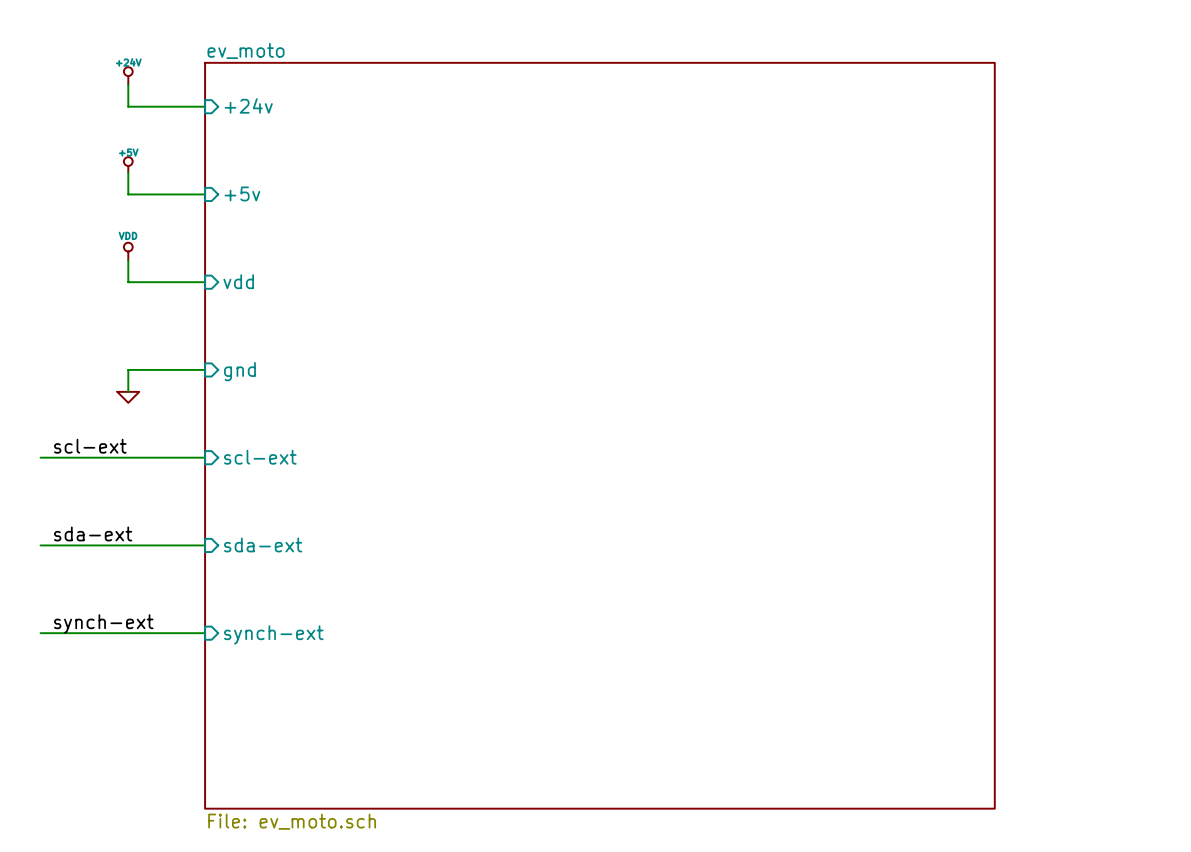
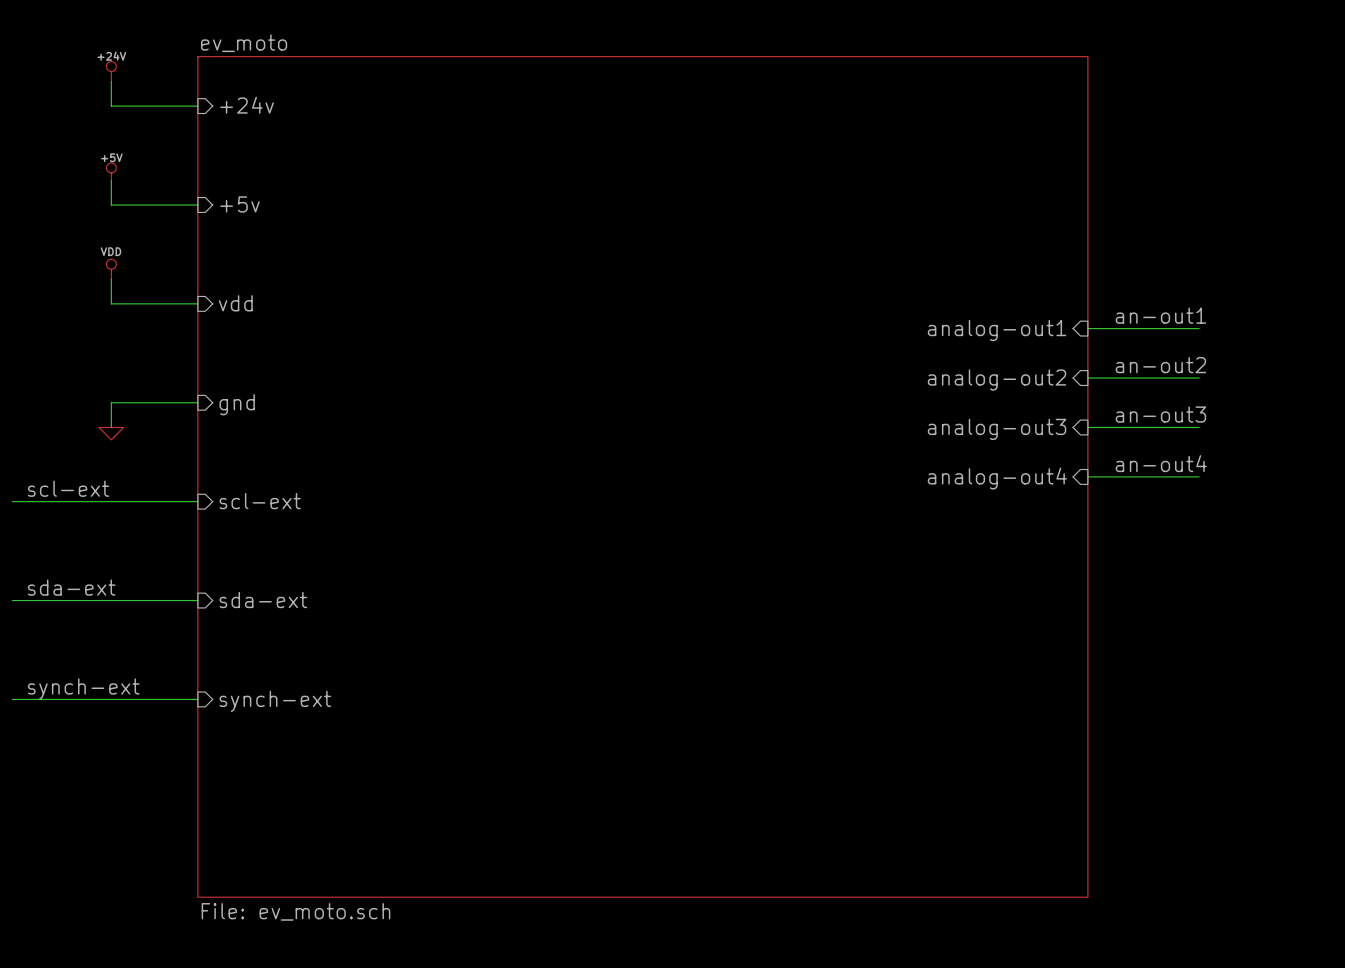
label: none -> an-out1 (1160, 315)
wire: none -> (1087, 328) (1199, 328)
sheet pin: none -> analog-out1 (997, 330)
label: none -> an-out2 (1160, 365)
wire: none -> (1087, 378) (1199, 378)
sheet pin: none -> analog-out2 (997, 379)
label: none -> an-out3 (1160, 414)
wire: none -> (1087, 427) (1199, 427)
sheet pin: none -> analog-out3 (997, 429)
label: none -> an-out4 (1161, 463)
wire: none -> (1087, 476) (1199, 476)
sheet pin: none -> analog-out4 (997, 478)

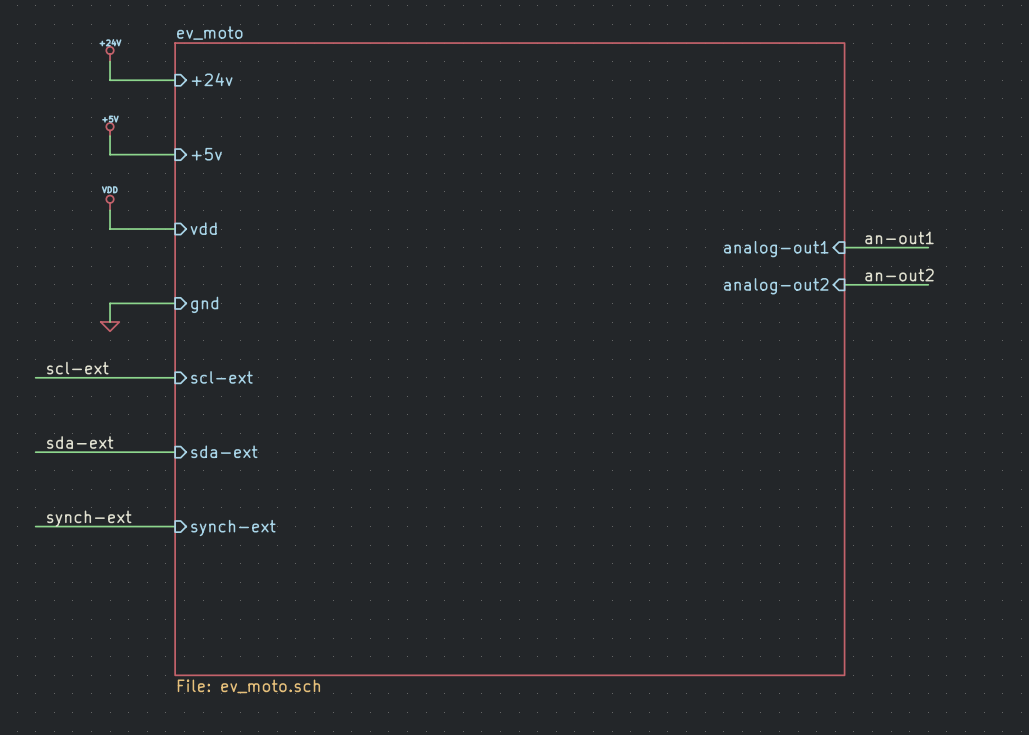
label: an-out3 (1160, 414) -> none
wire: (1087, 427) (1199, 427) -> none
sheet pin: analog-out3 (997, 429) -> none
label: an-out4 (1161, 463) -> none
wire: (1087, 476) (1199, 476) -> none
sheet pin: analog-out4 (997, 478) -> none

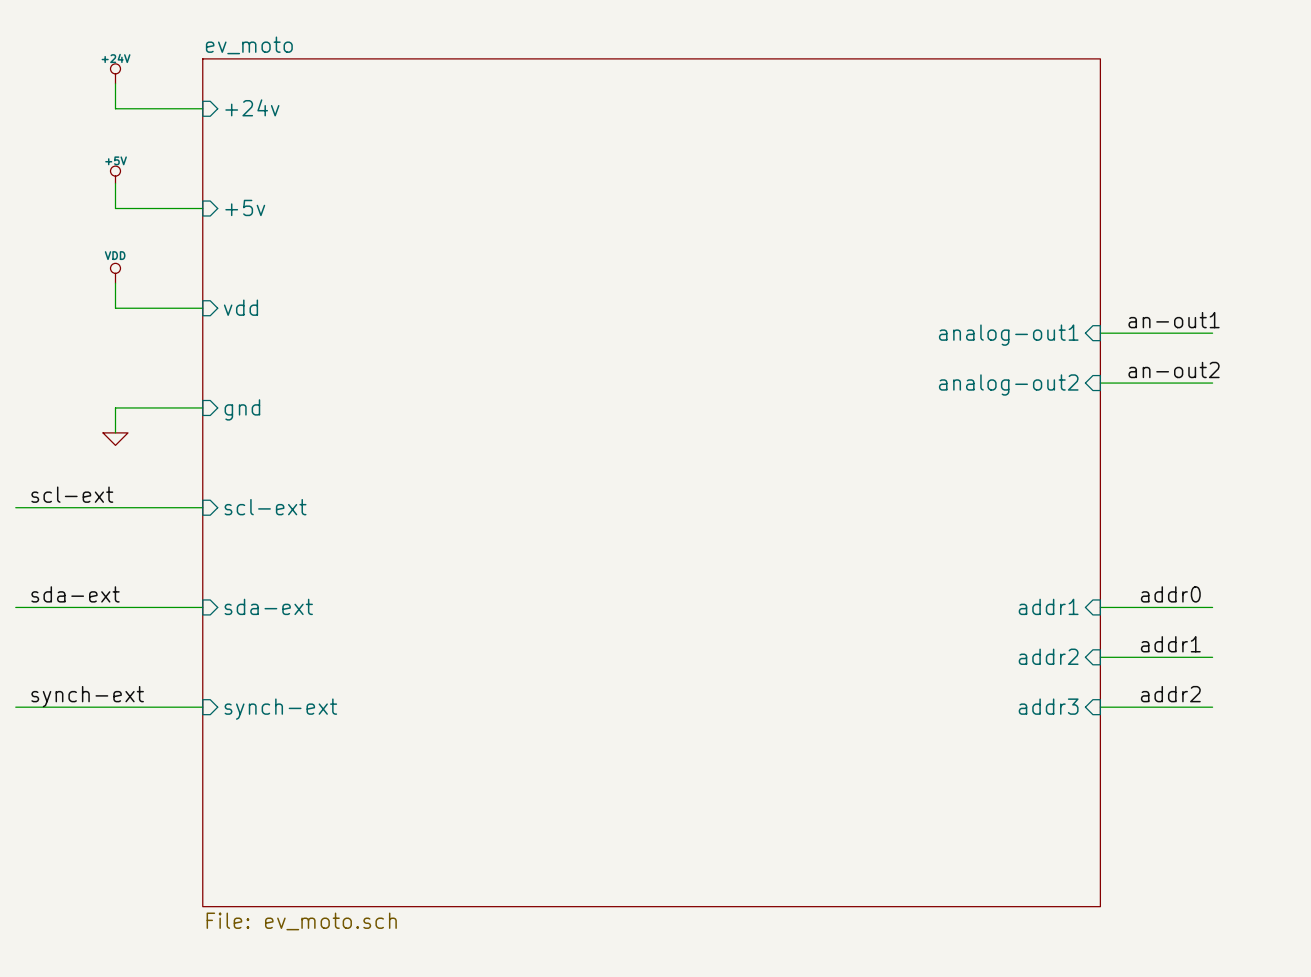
label: none -> addr0 (1170, 594)
sheet pin: none -> addr1 (1048, 606)
wire: none -> (1100, 607) (1212, 607)
label: none -> addr1 (1170, 644)
sheet pin: none -> addr2 (1048, 656)
wire: none -> (1100, 657) (1212, 657)
label: none -> addr2 (1170, 694)
sheet pin: none -> addr3 (1048, 706)
wire: none -> (1100, 707) (1212, 707)

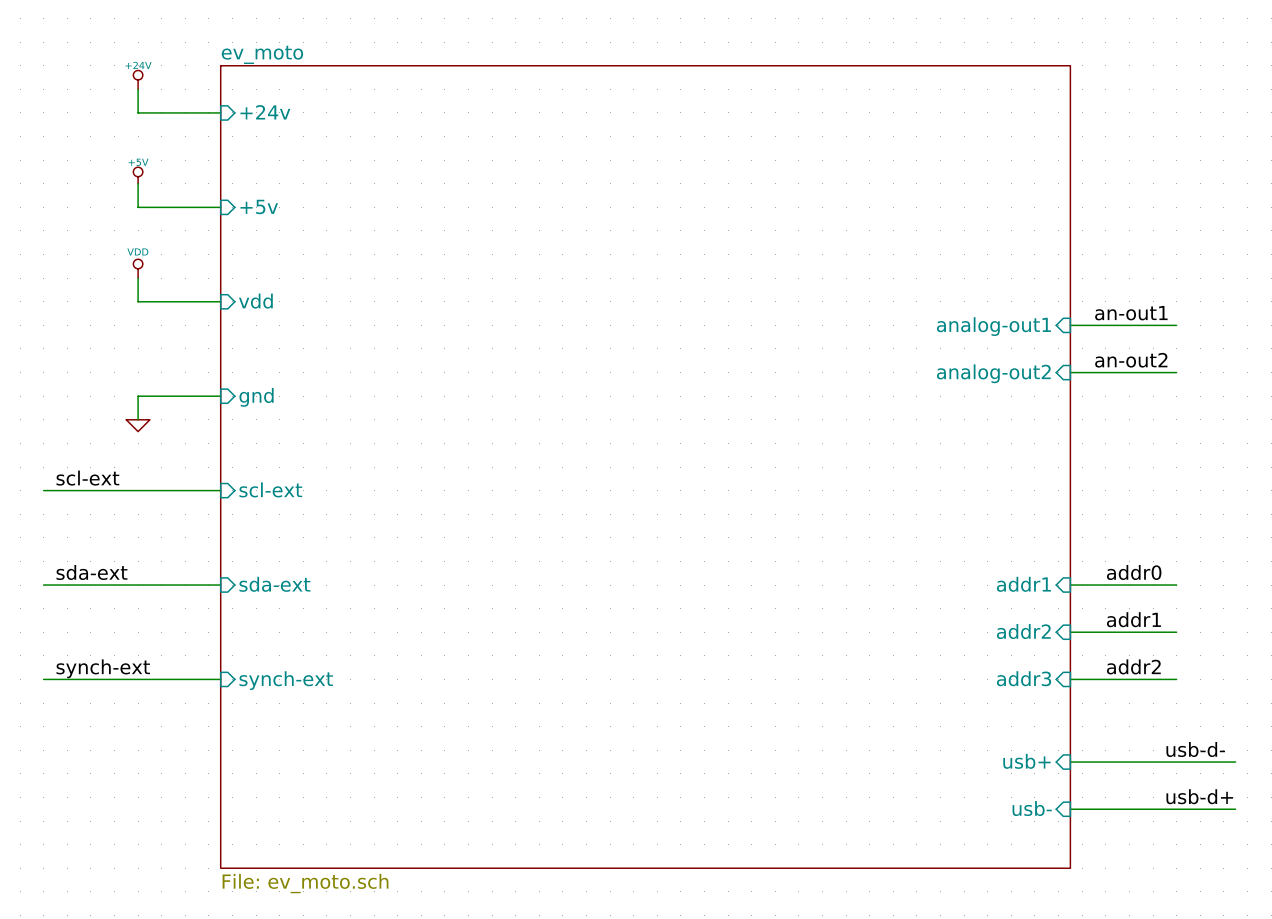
label: none -> usb-d- (1195, 749)
sheet pin: none -> usb+ (1026, 761)
wire: none -> (1070, 762) (1235, 762)
label: none -> usb-d+ (1199, 796)
sheet pin: none -> usb- (1032, 808)
wire: none -> (1070, 809) (1235, 809)

